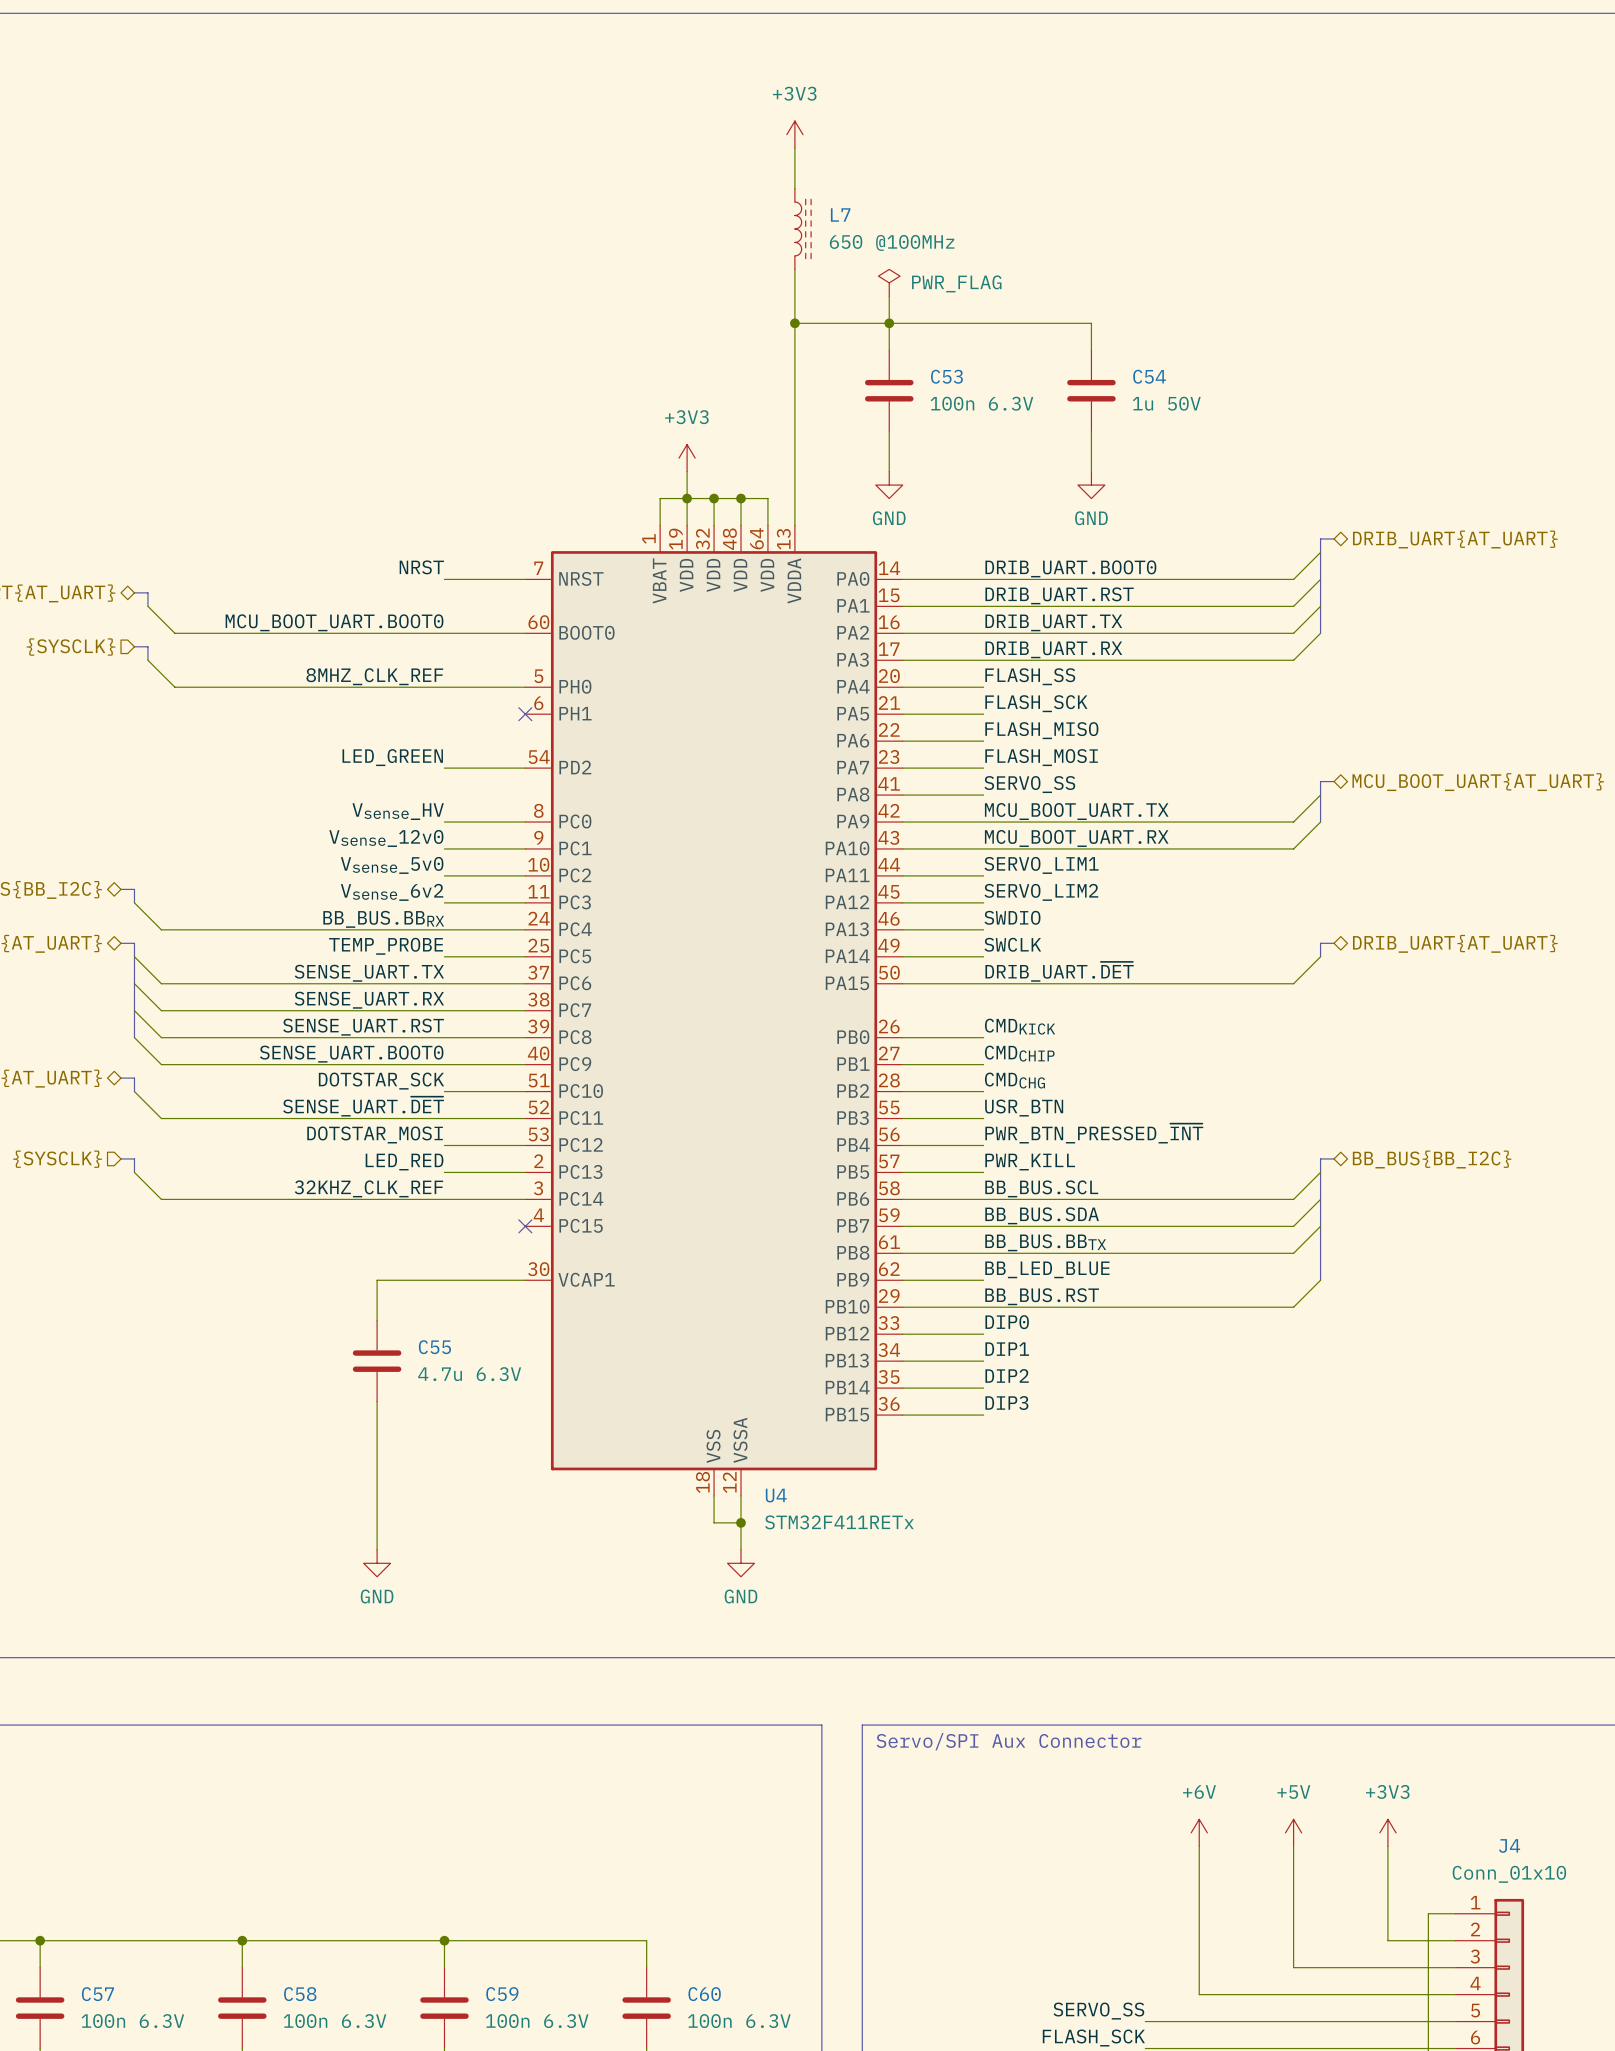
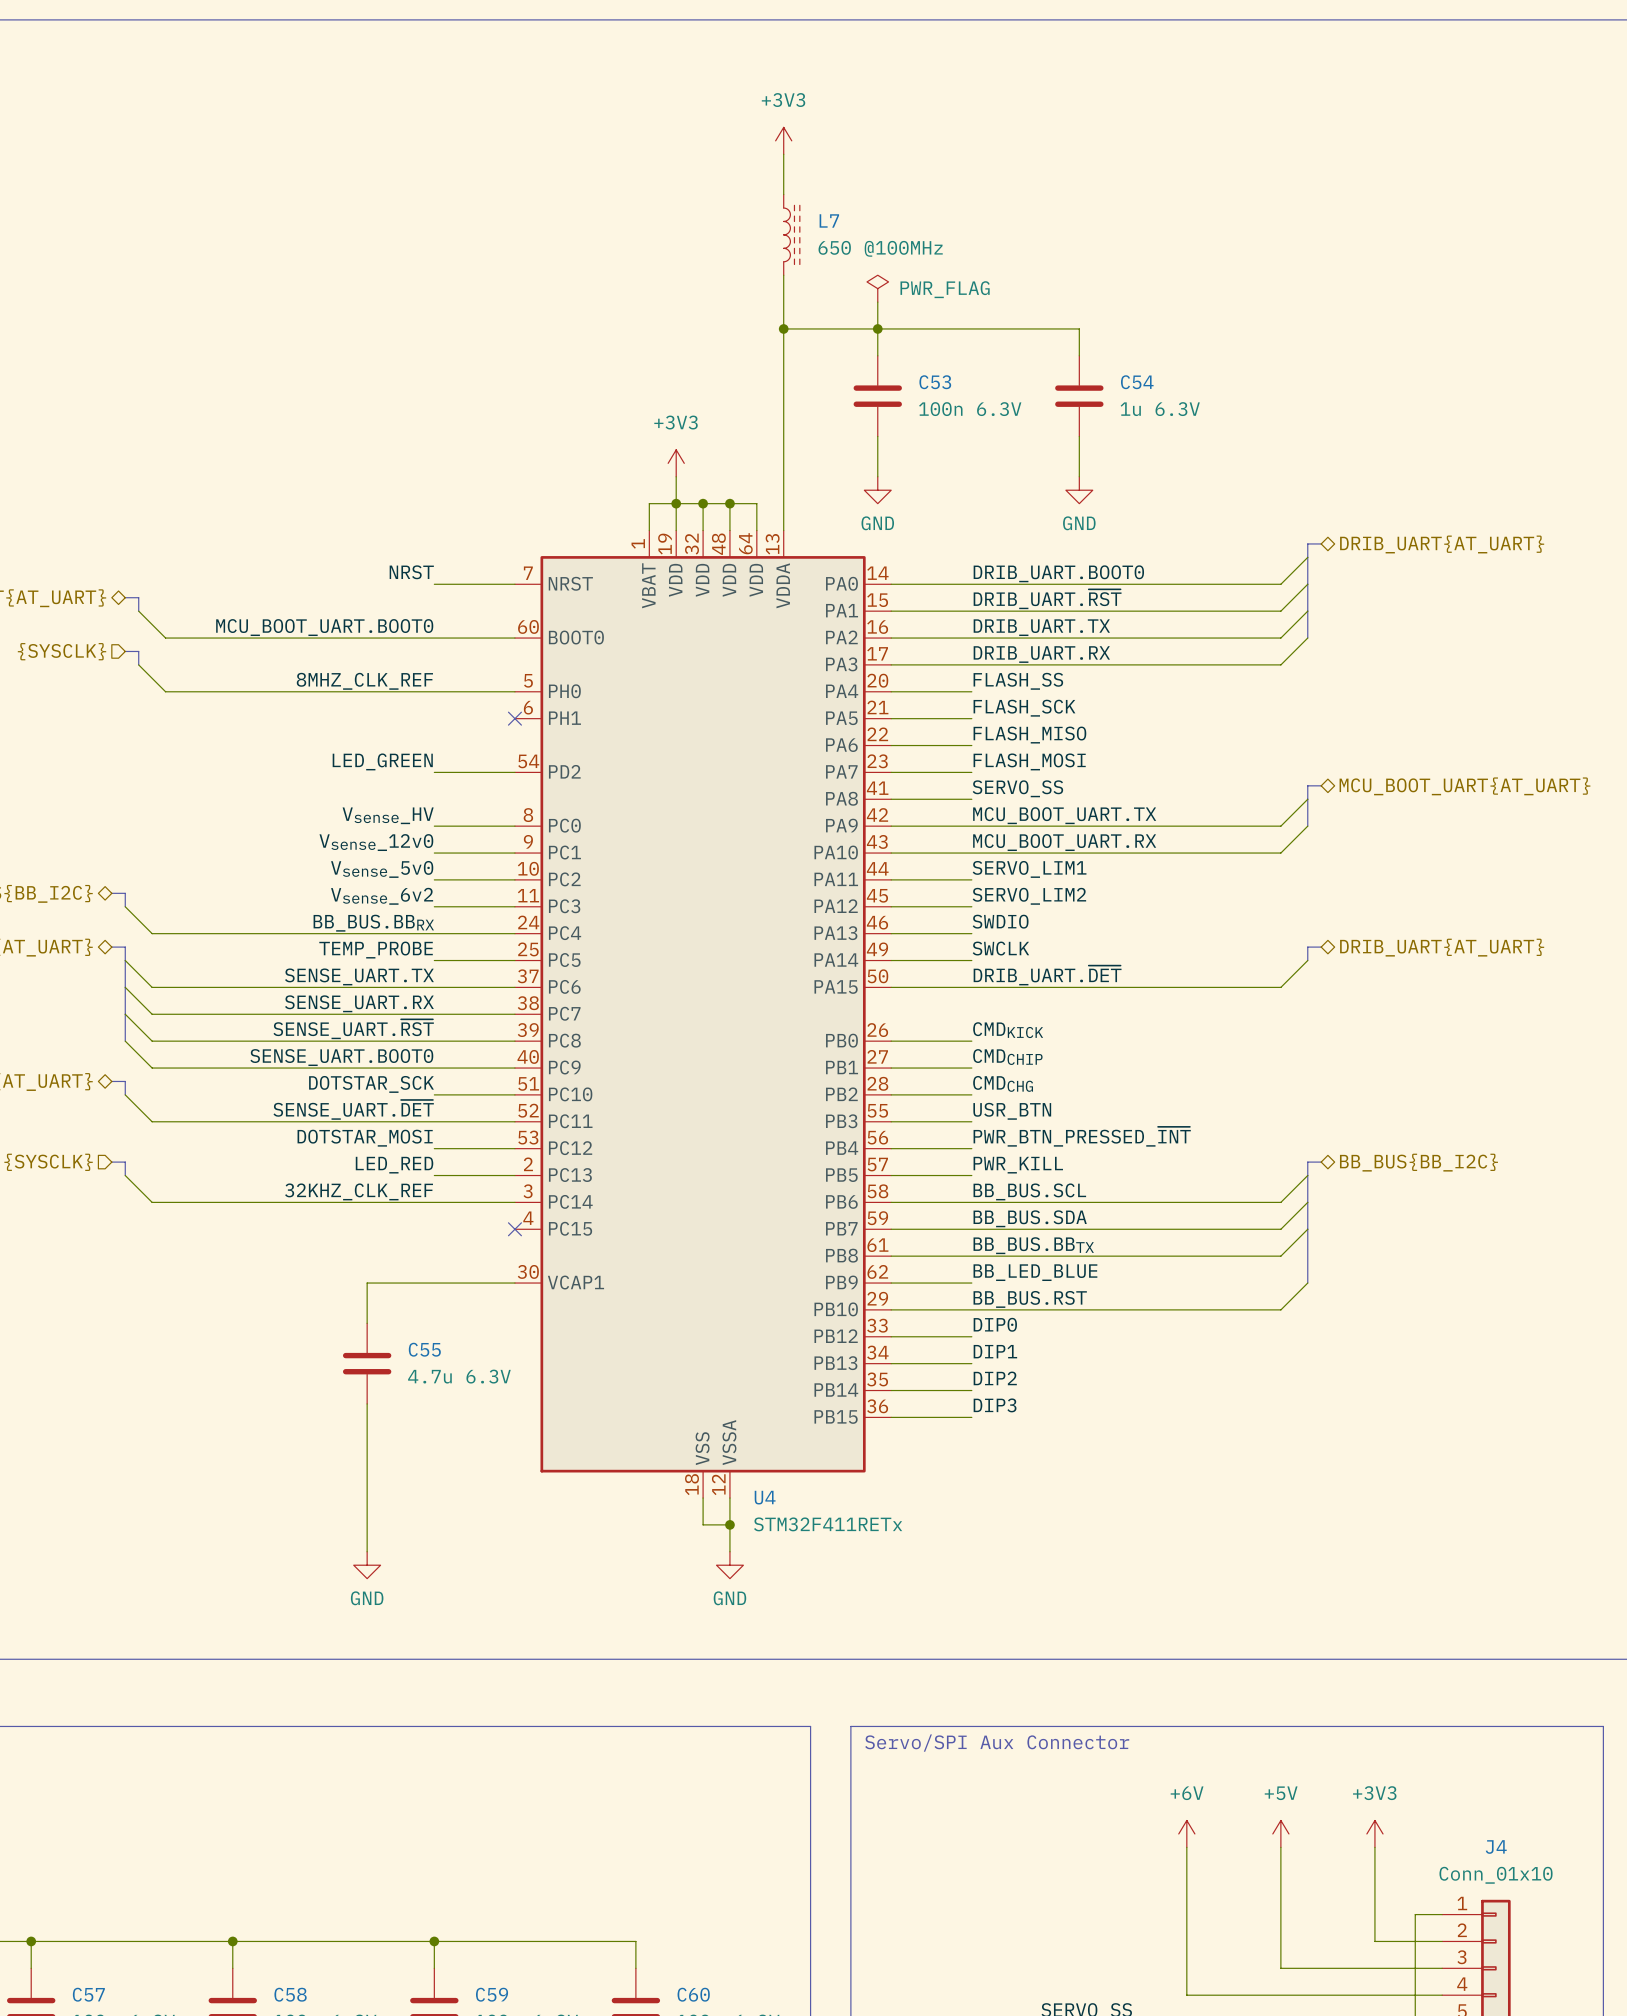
C54 value: 1u 50V (1166, 403) -> 1u 6.3V (1160, 409)
label: DRIB_UART.RST (1059, 595) -> DRIB_UART.~{RST} (1047, 599)
label: SENSE_UART.RST (363, 1027) -> SENSE_UART.~{RST} (353, 1029)

